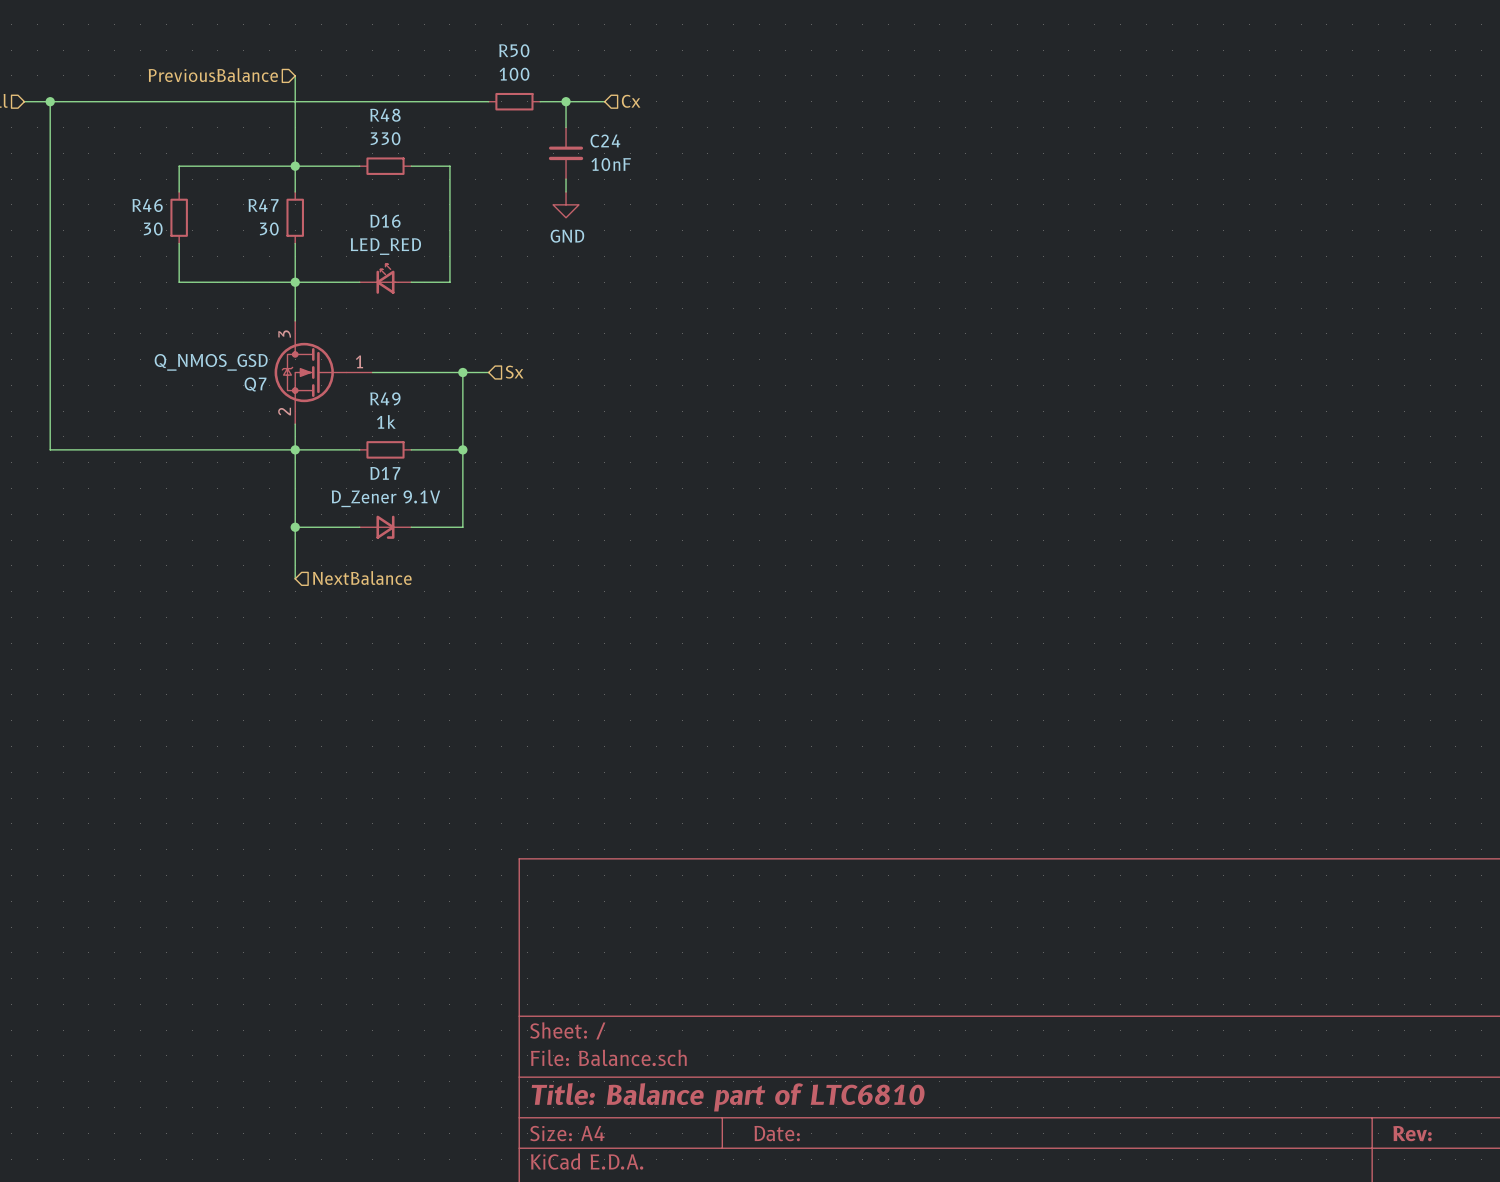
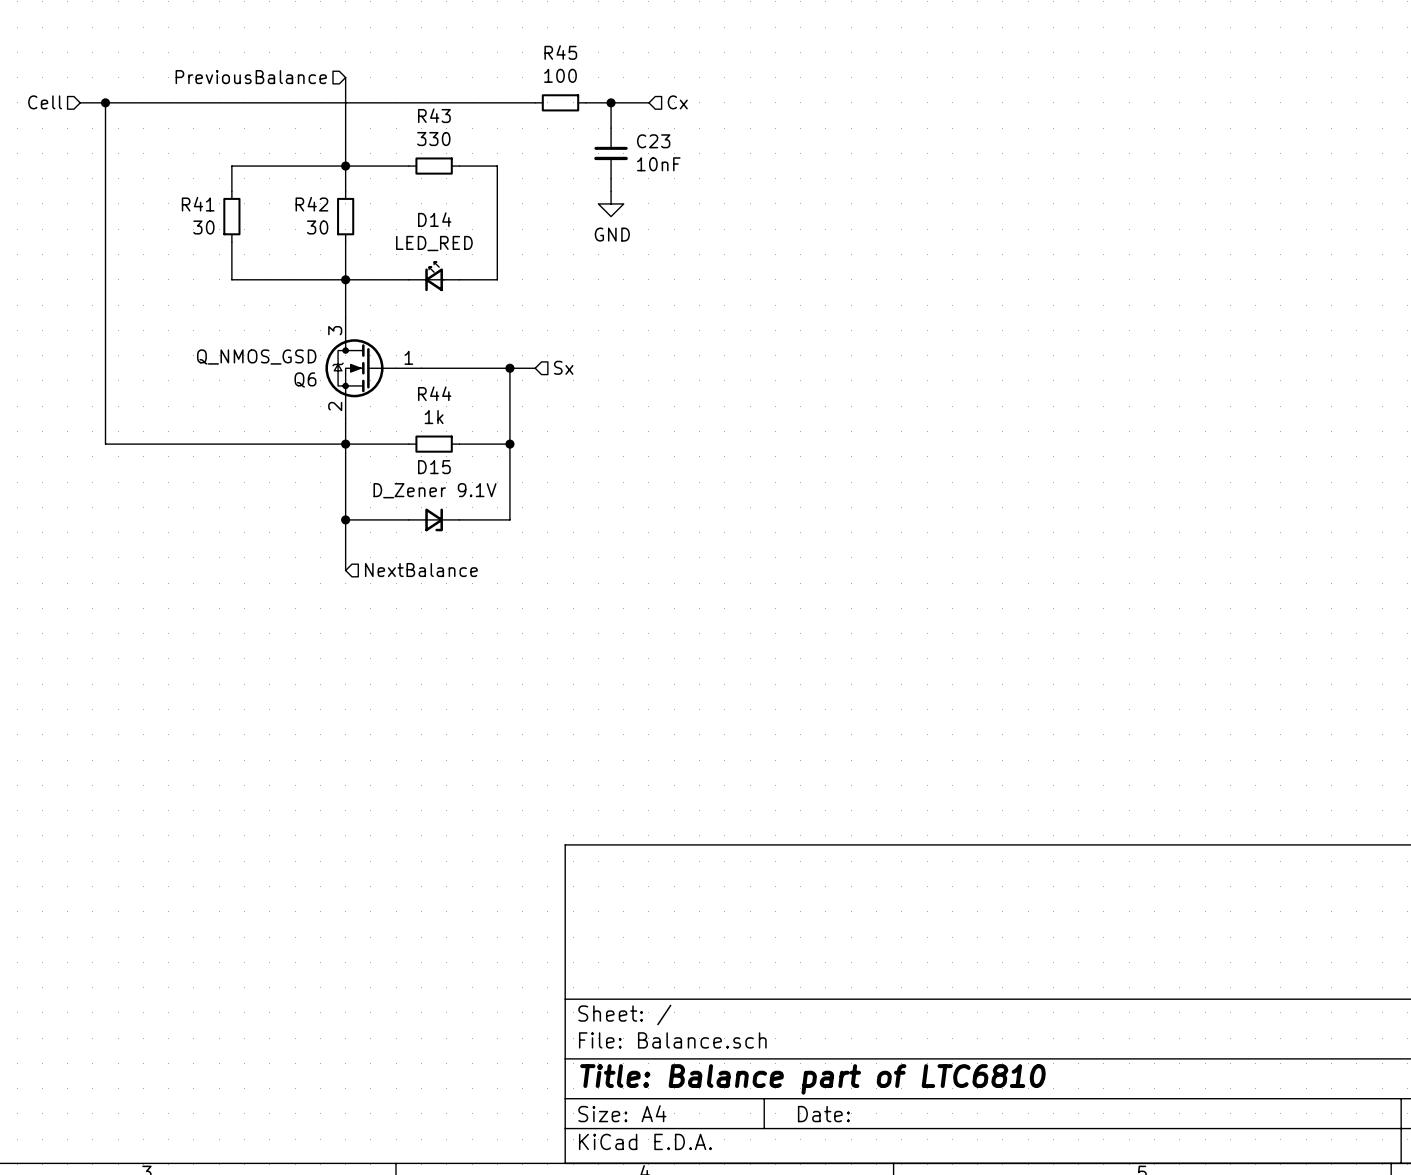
R50 name: R50 (514, 50) -> R45 (560, 52)
R48 name: R48 (385, 115) -> R43 (434, 115)
C24 name: C24 (605, 141) -> C23 (653, 141)
R46 name: R46 (147, 205) -> R41 (198, 204)
R47 name: R47 (263, 205) -> R42 (311, 204)
D16 name: D16 (385, 221) -> D14 (434, 219)
Q7 name: Q7 (255, 384) -> Q6 (305, 380)
R49 name: R49 (385, 398) -> R44 (434, 393)
D17 name: D17 (385, 473) -> D15 (434, 467)

